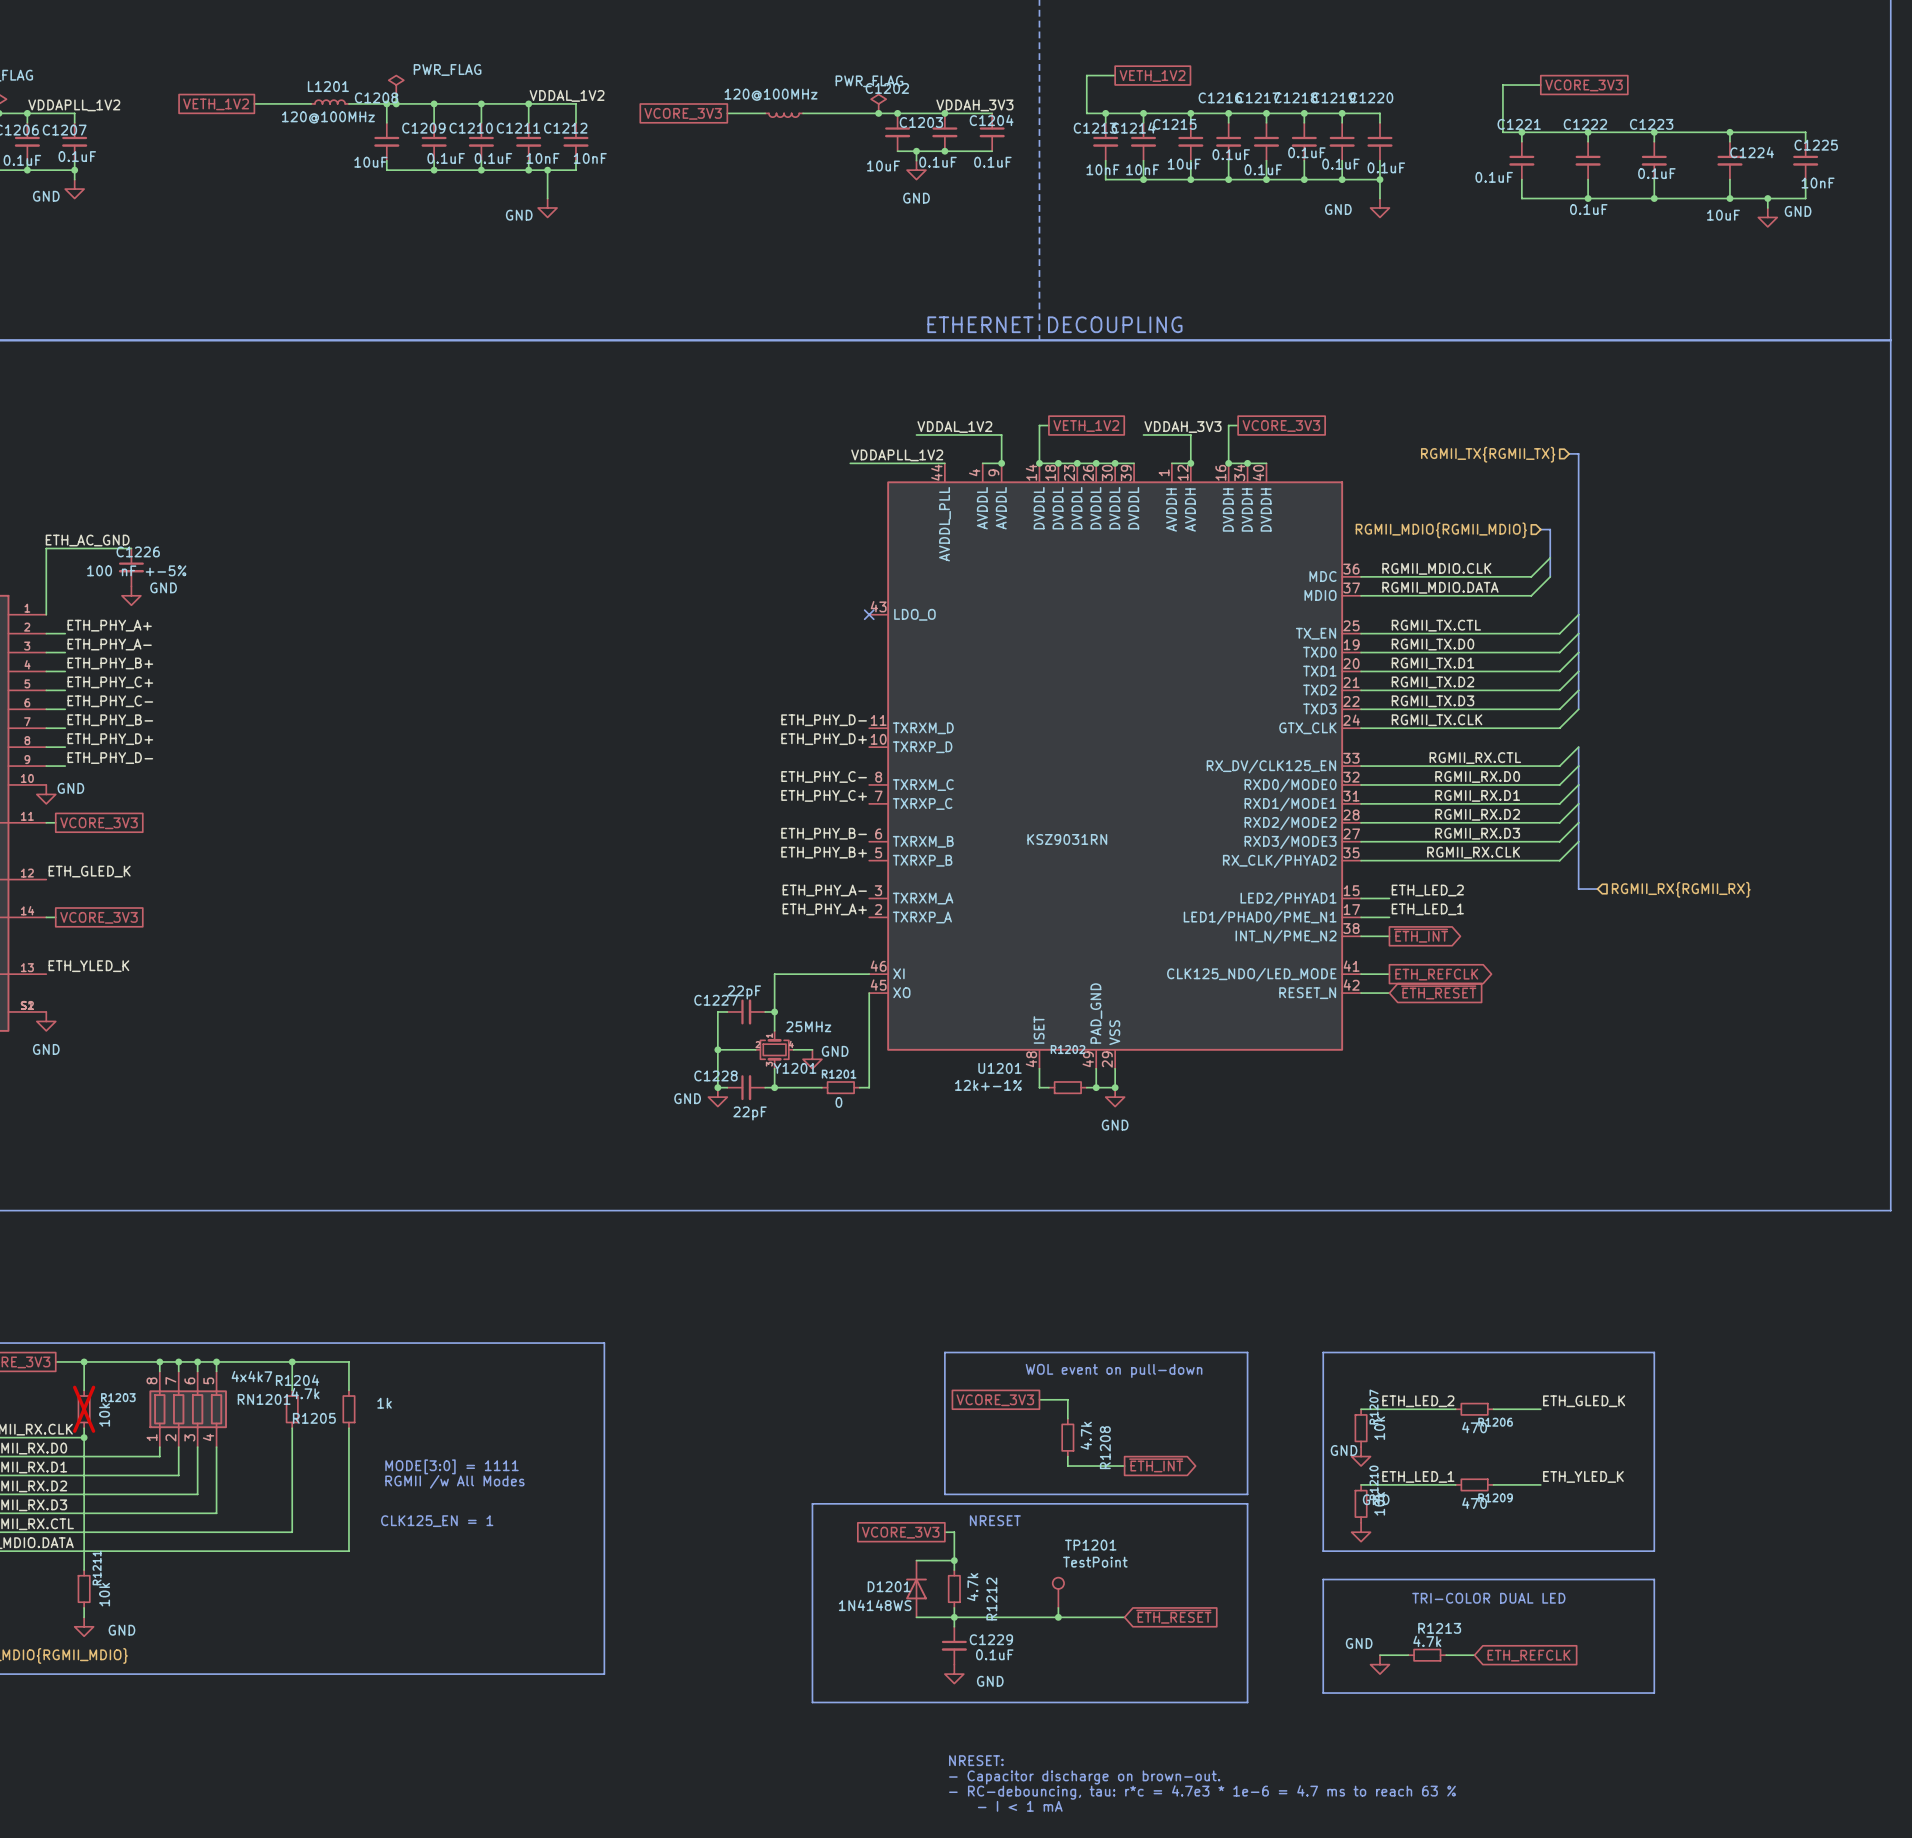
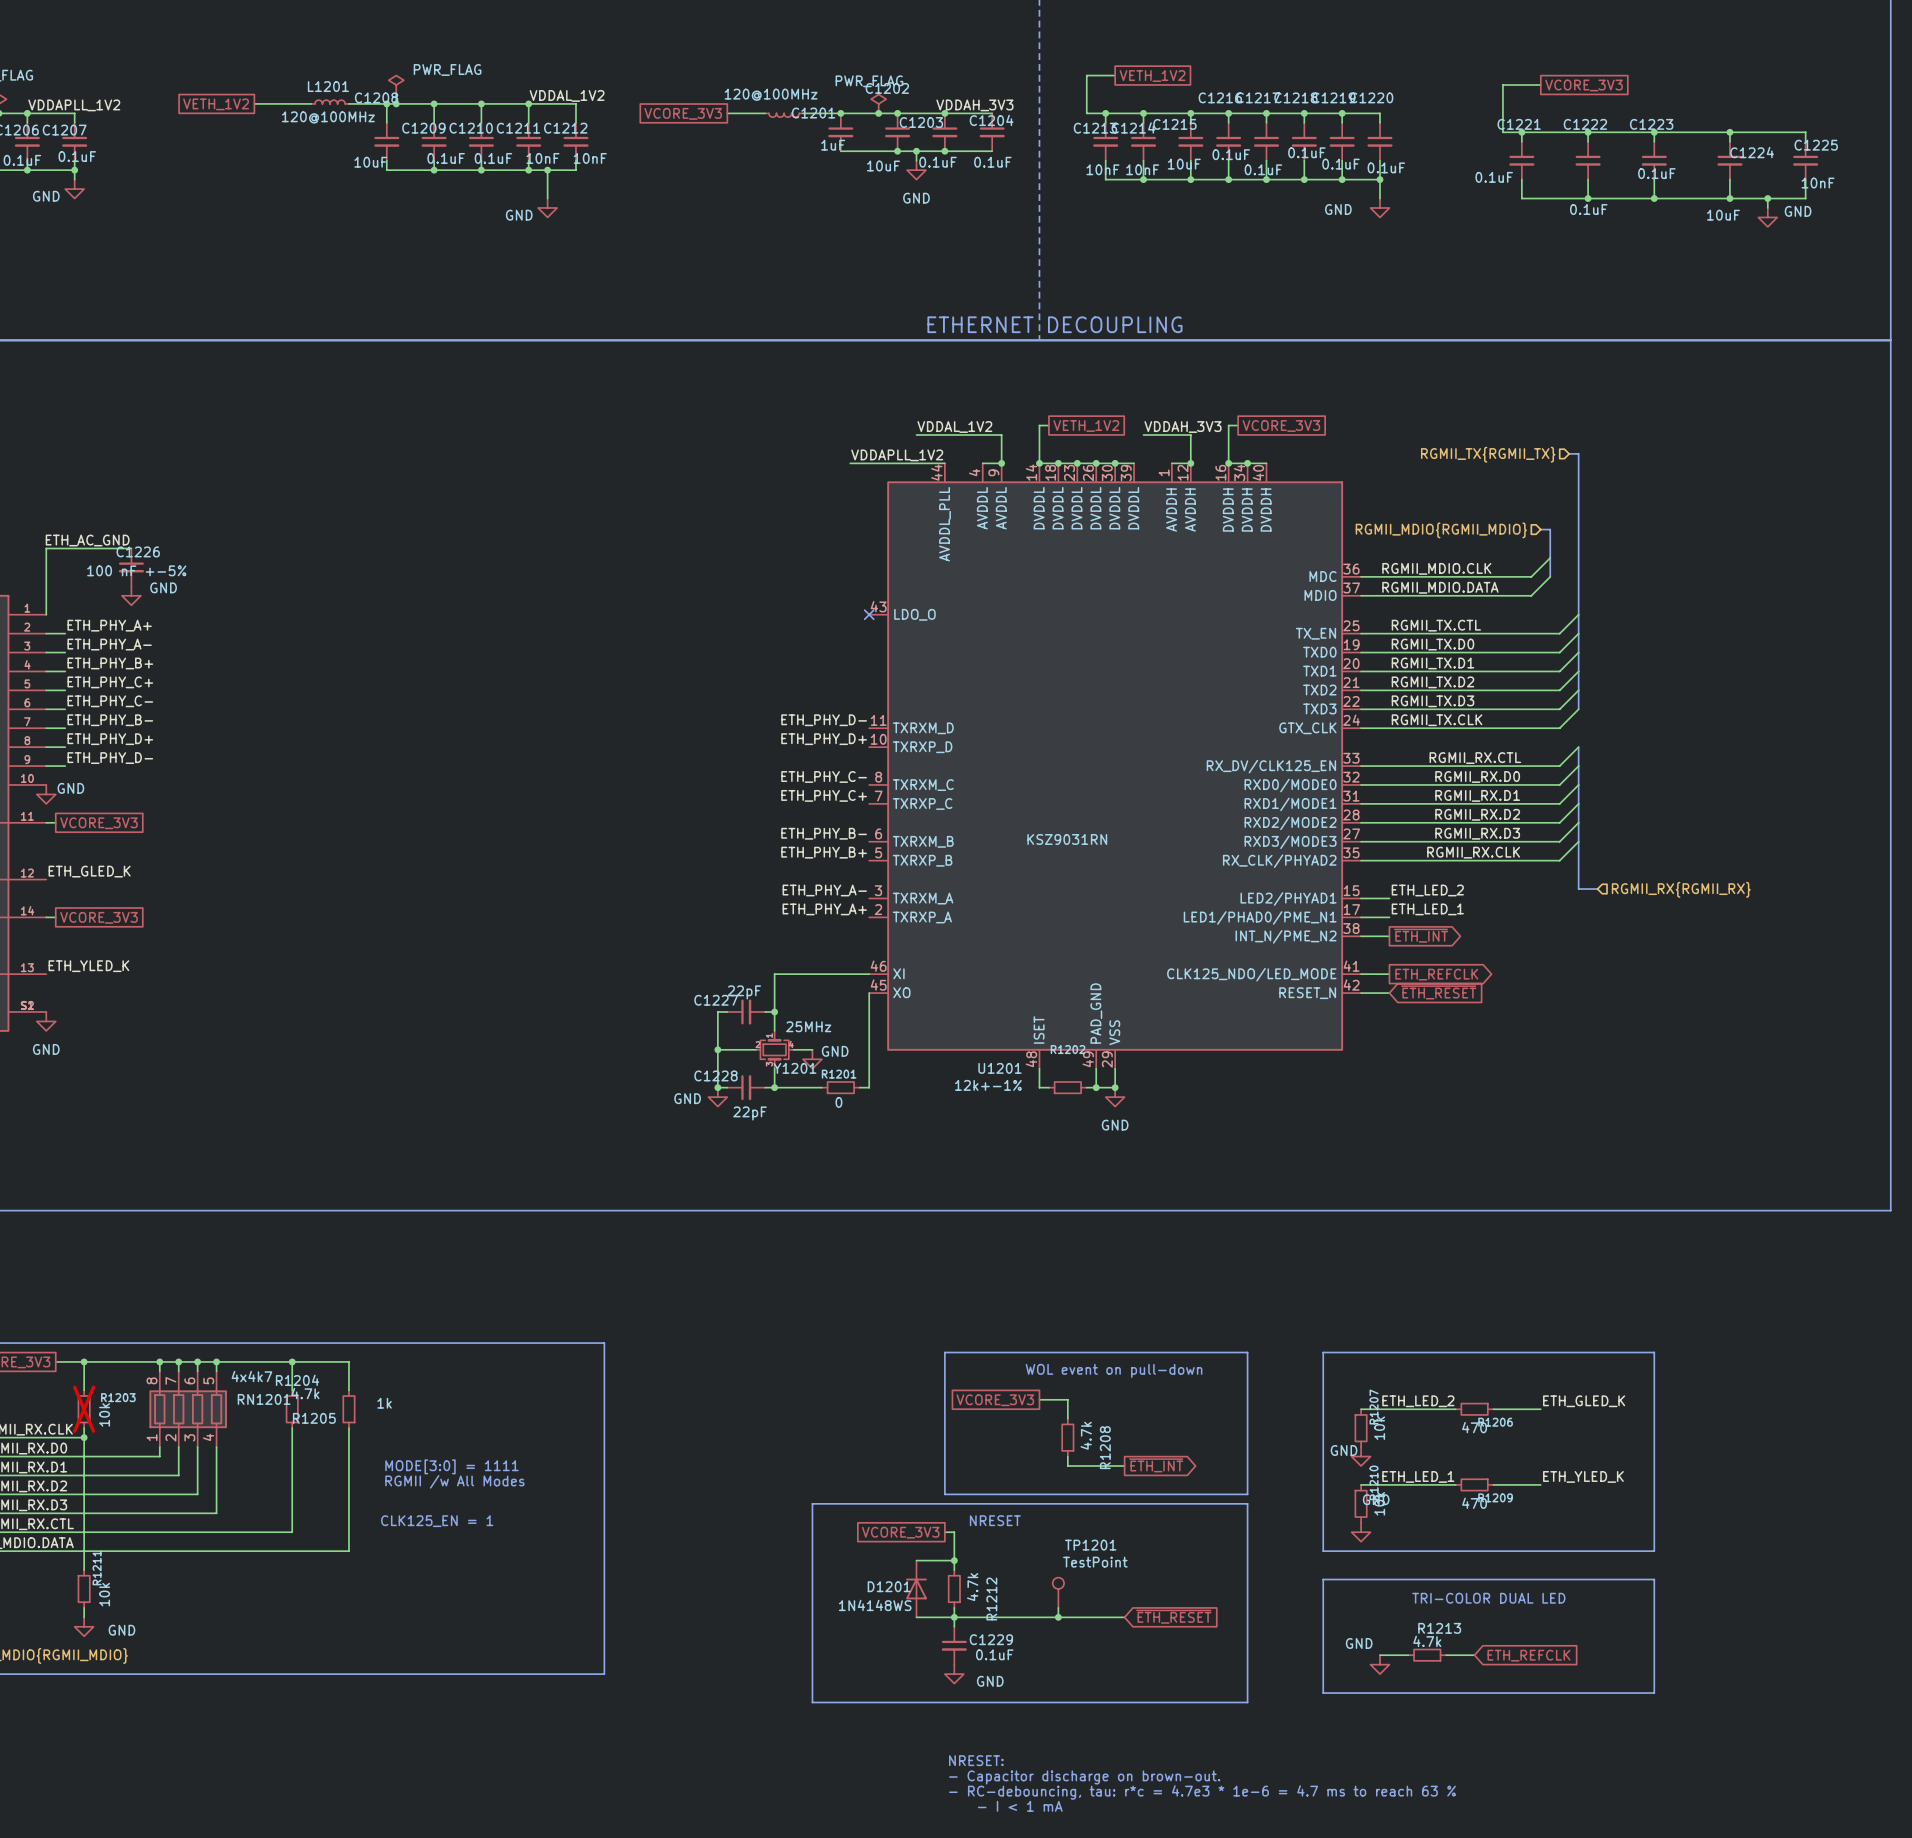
junction: none -> (840, 113)
C1201: none -> 1uF (840, 132)
wire: none -> (840, 151) (897, 151)
junction: none -> (897, 151)

